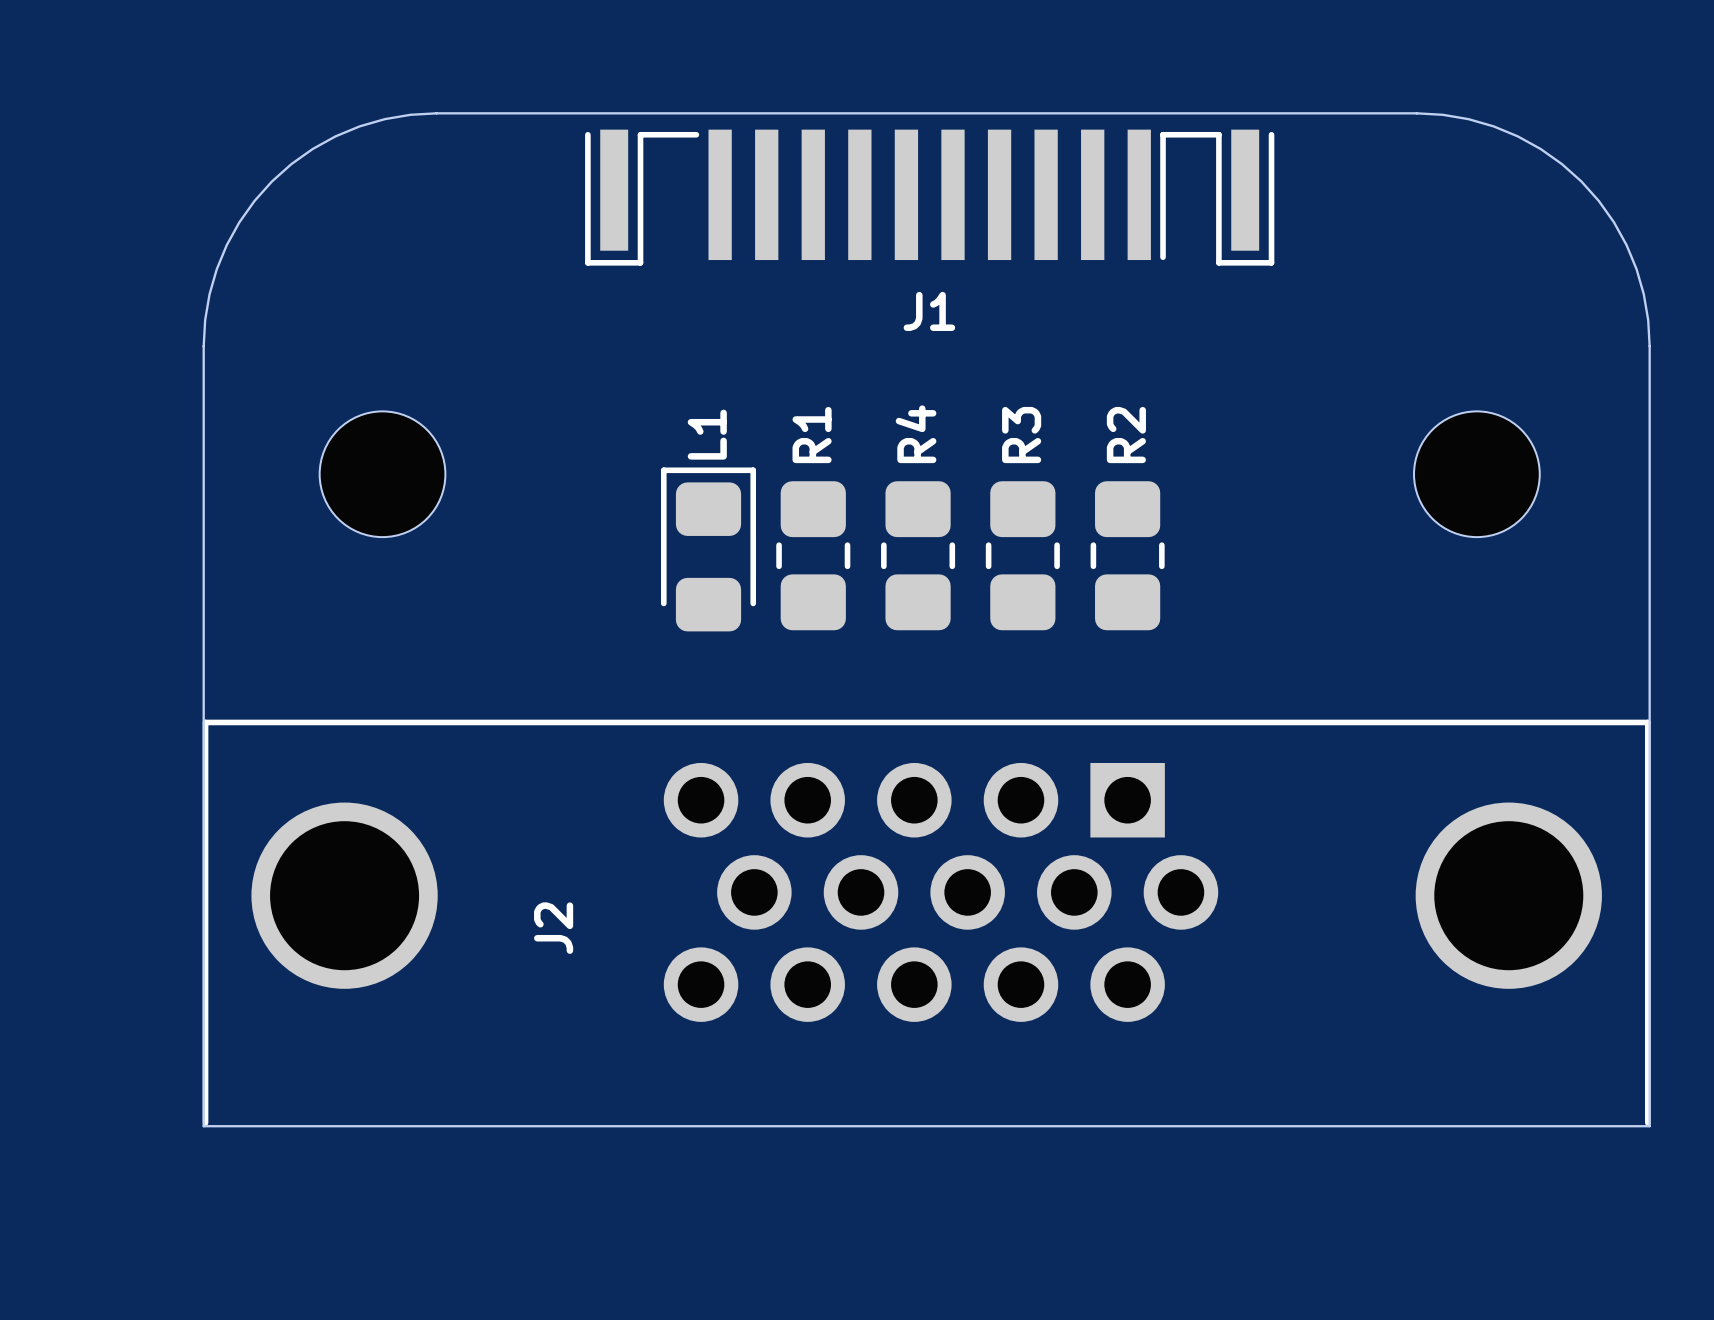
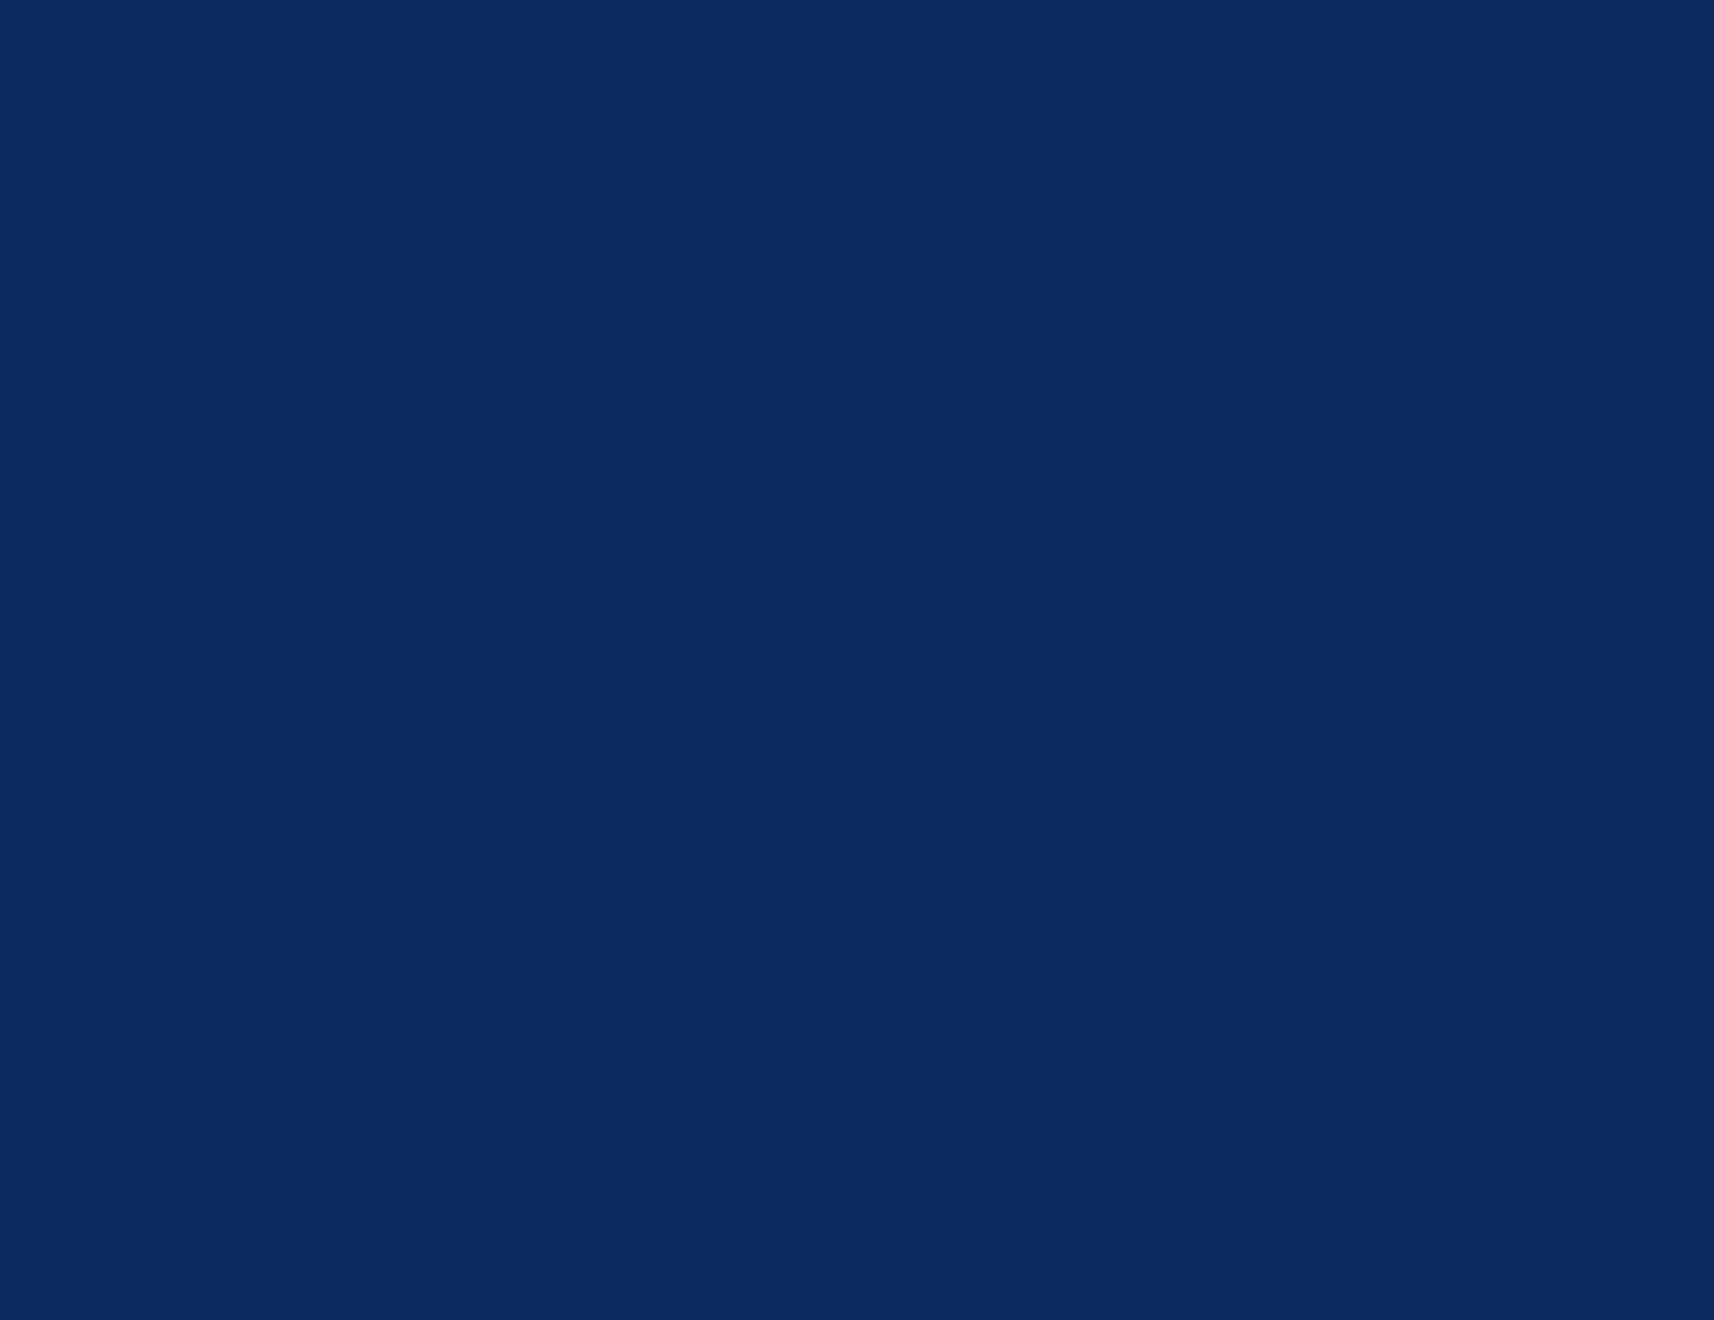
board edge: (436, 113) (1416, 113) (1468, 119) (1493, 126) (1540, 149) (1561, 164) (1598, 201) (1613, 222) (1636, 269) (1648, 320) (1649, 1126) (203, 1126) (203, 346) (209, 294) (226, 245) (239, 222) (254, 201) (291, 164) (335, 136) (359, 126) (410, 114) (436, 113) -> none
J1: (929, 197) -> none
part: (382, 474) -> none
part: (1476, 474) -> none
L1: (708, 549) -> none
R1: (813, 555) -> none
R4: (918, 555) -> none
R3: (1022, 555) -> none
R2: (1127, 555) -> none
J2: (926, 922) -> none

